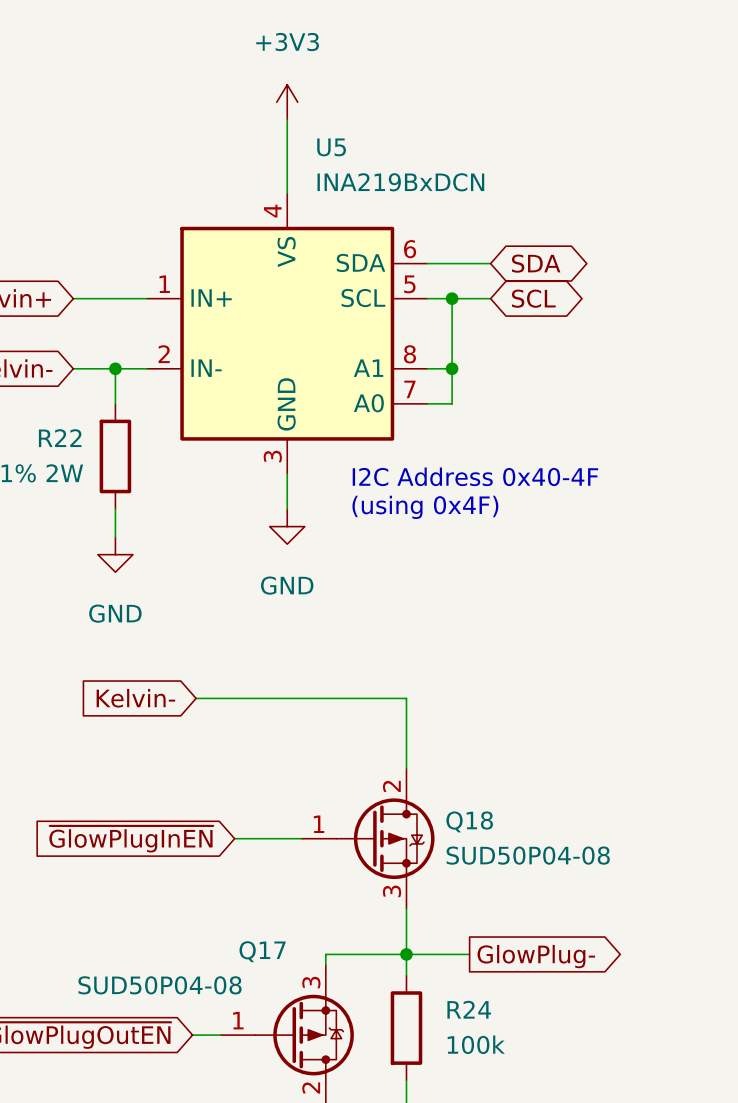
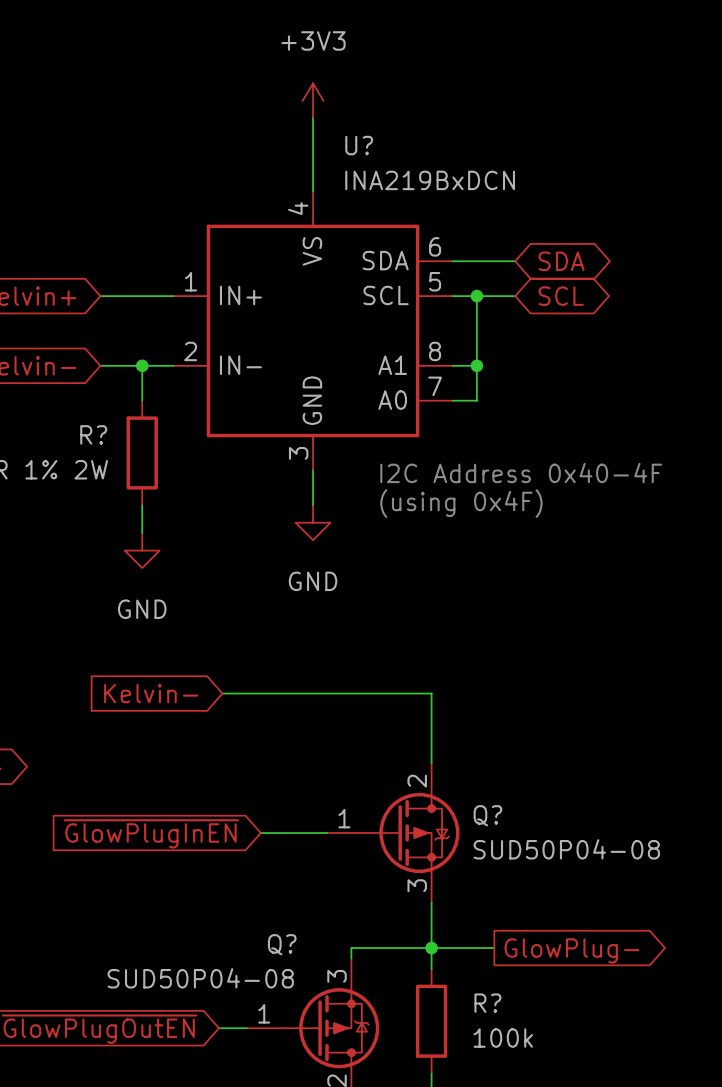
U5 name: U5 (331, 147) -> U? (359, 145)
R22 name: R22 (60, 438) -> R? (93, 434)
Q18 name: Q18 (469, 821) -> Q? (487, 815)
Q17 name: Q17 (262, 951) -> Q? (282, 944)
R24 name: R24 (469, 1009) -> R? (487, 1003)

